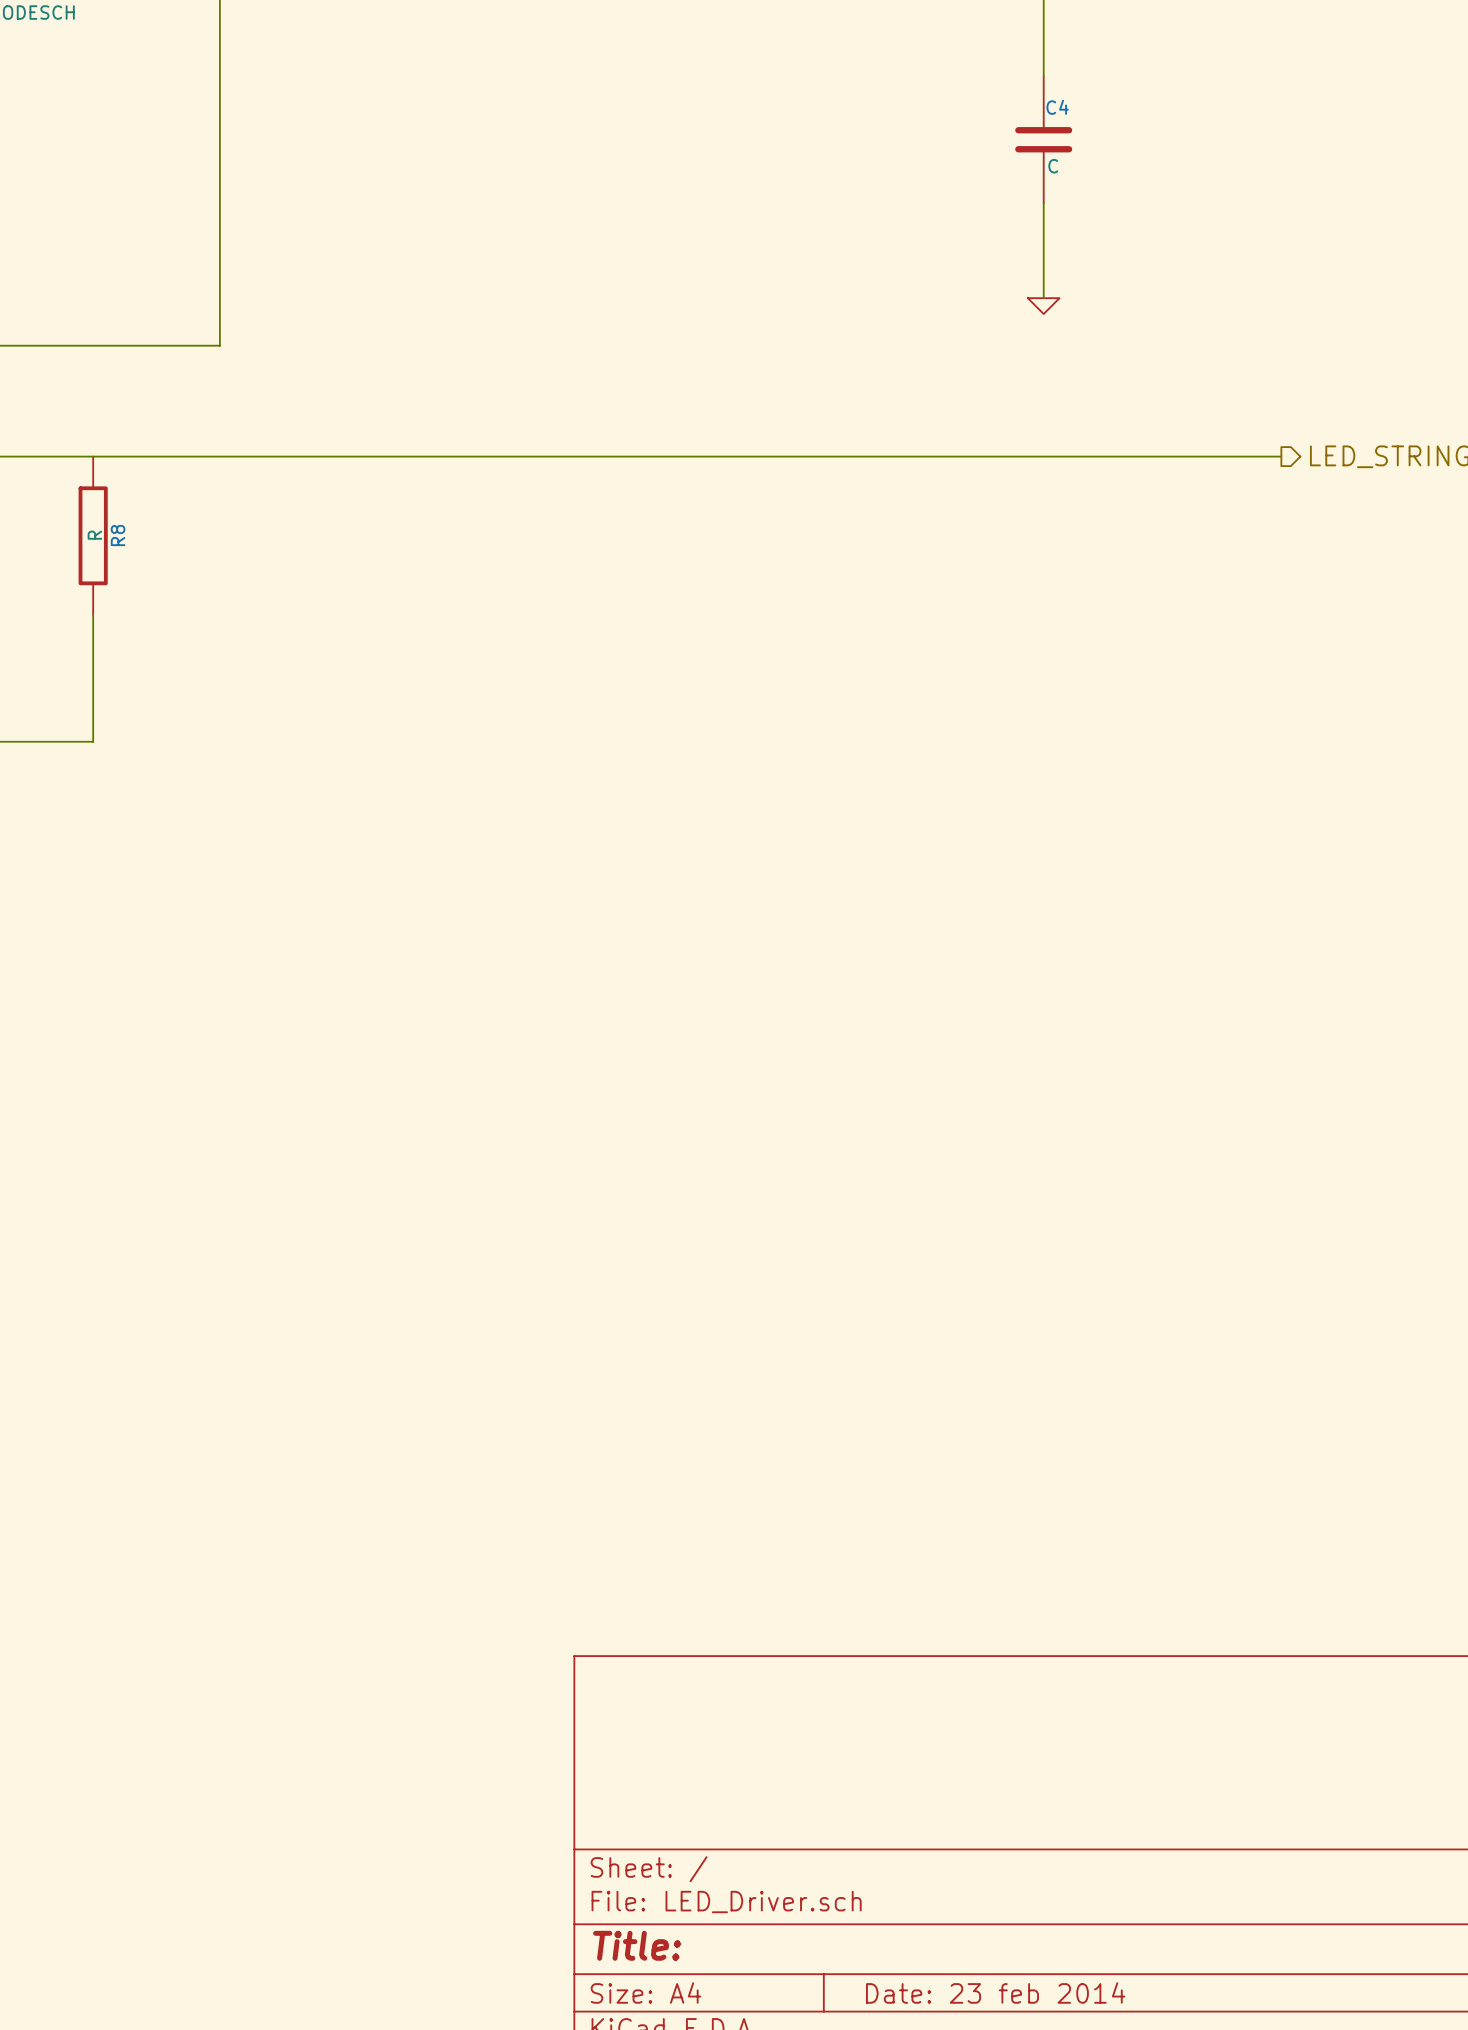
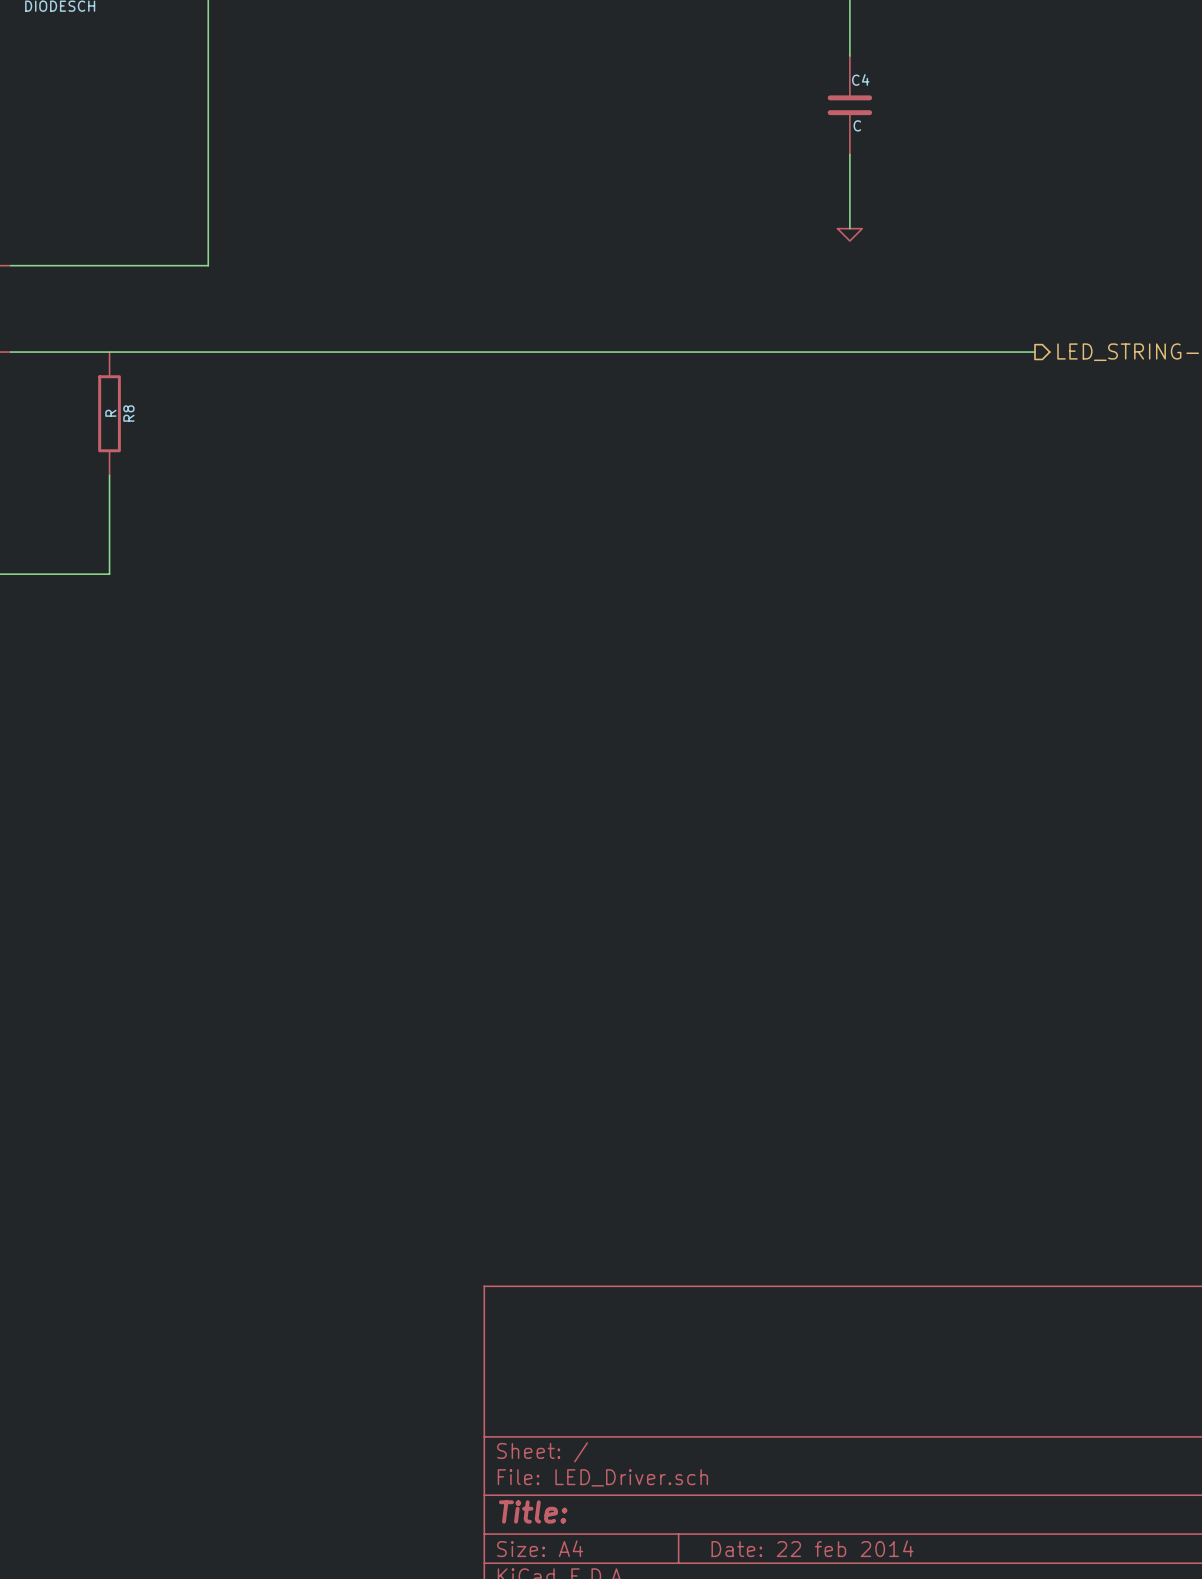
title block: Date: 23 feb 2014 (995, 1992) -> Date: 22 feb 2014 (812, 1548)

